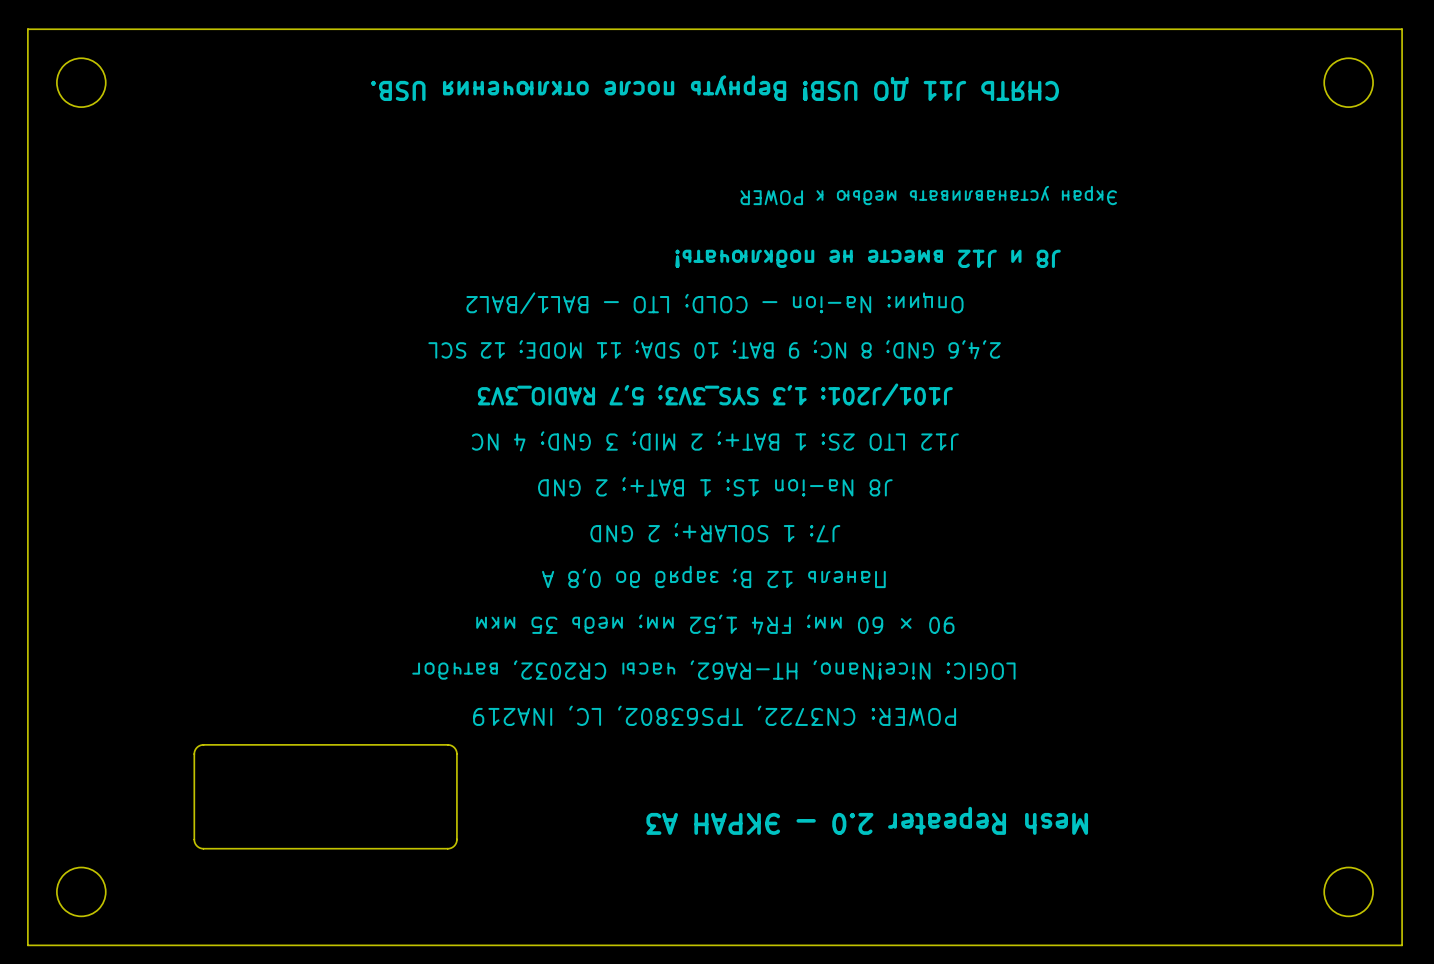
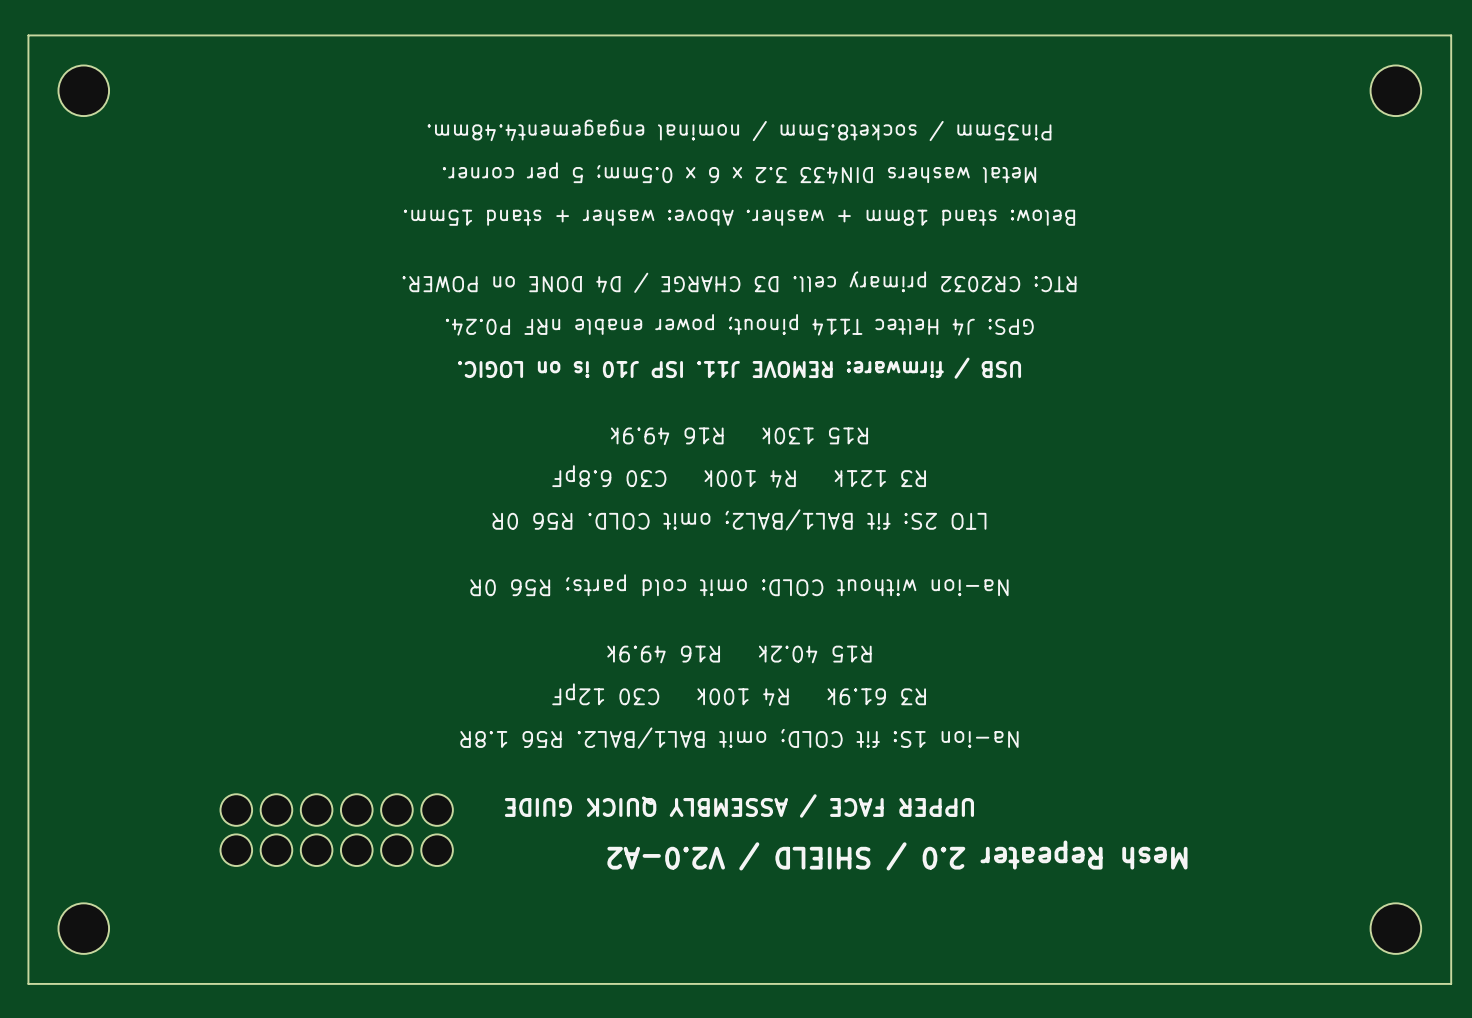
text: СНЯТЬ J11 ДО USB! Вернуть после отключения USB. (714, 88) -> none
text: none -> Pin35mm / socket8.5mm / nominal engagement4.48mm. (739, 130)
text: none -> Metal washers DIN433 3.2 x 6 x 0.5mm; 5 per corner. (739, 173)
text: Экран устанавливать медью к POWER (928, 195) -> none
text: none -> Below: stand 18mm + washer. Above: washer + stand 15mm. (739, 217)
text: J8 и J12 вместе не подключать! (868, 258) -> none
text: none -> RTC: CR2032 primary cell. D3 CHARGE / D4 DONE on POWER. (739, 282)
text: Опции: Na-ion — COLD; LTO — BAL1/BAL2 (714, 303) -> GPS: J4 Heltec T114 pinout; power enable nRF P0.24. (739, 324)
text: 2,4,6 GND; 8 NC; 9 BAT; 10 SDA; 11 MODE; 12 SCL (714, 349) -> USB / firmware: REMOVE J11. ISP J10 is on LOGIC. (739, 368)
text: J101/J201: 1,3 SYS_3V3; 5,7 RADIO_3V3 (715, 394) -> none
text: none -> R15 130k R16 49.9k (739, 436)
text: J12 LTO 2S: 1 BAT+; 2 MID; 3 GND; 4 NC (715, 441) -> none
text: none -> R3 121k R4 100k C30 6.8pF (739, 476)
text: J8 Na-ion 1S: 1 BAT+; 2 GND (715, 486) -> LTO 2S: fit BAL1/BAL2; omit COLD. R56 0R (739, 519)
text: J7: 1 SOLAR+; 2 GND (715, 532) -> none
text: none -> Na-ion without COLD: omit cold parts; R56 0R (739, 585)
text: Панель 12 В; заряд до 0,8 А (713, 576) -> none
text: 90 × 60 мм; FR4 1,52 мм; медь 35 мкм (715, 624) -> R15 40.2k R16 49.9k (739, 654)
text: LOGIC: Nice!Nano, HT-RA62, часы CR2032, ватчдог (713, 670) -> R3 61.9k R4 100k C30 12pF (739, 694)
text: POWER: CN3722, TPS63802, LC, INA219 (714, 715) -> Na-ion 1S: fit COLD; omit BAL1/BAL2. R56 1.8R (739, 738)
drawing: [193, 744, 458, 850] -> none
text: none -> UPPER FACE / ASSEMBLY QUICK GUIDE (739, 805)
part: none -> (336, 830)
text: Mesh Repeater 2.0 — ЭКРАН A3 (867, 820) -> Mesh Repeater 2.0 / SHIELD / V2.0-A2 (897, 855)

